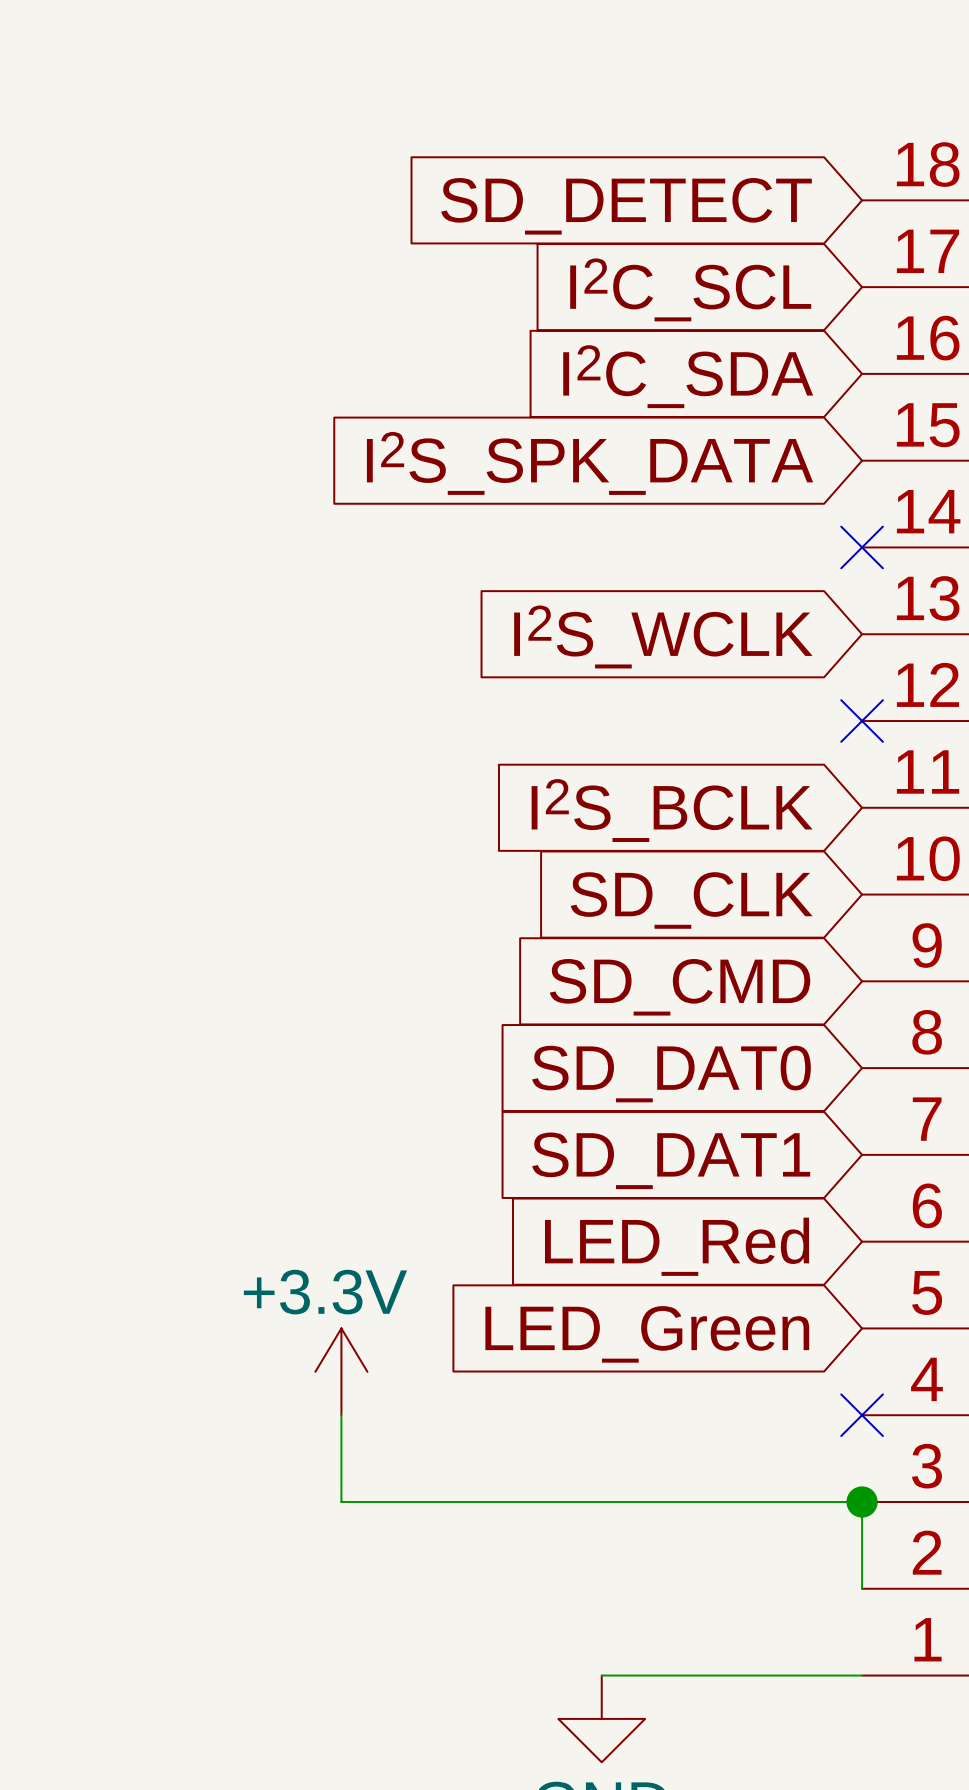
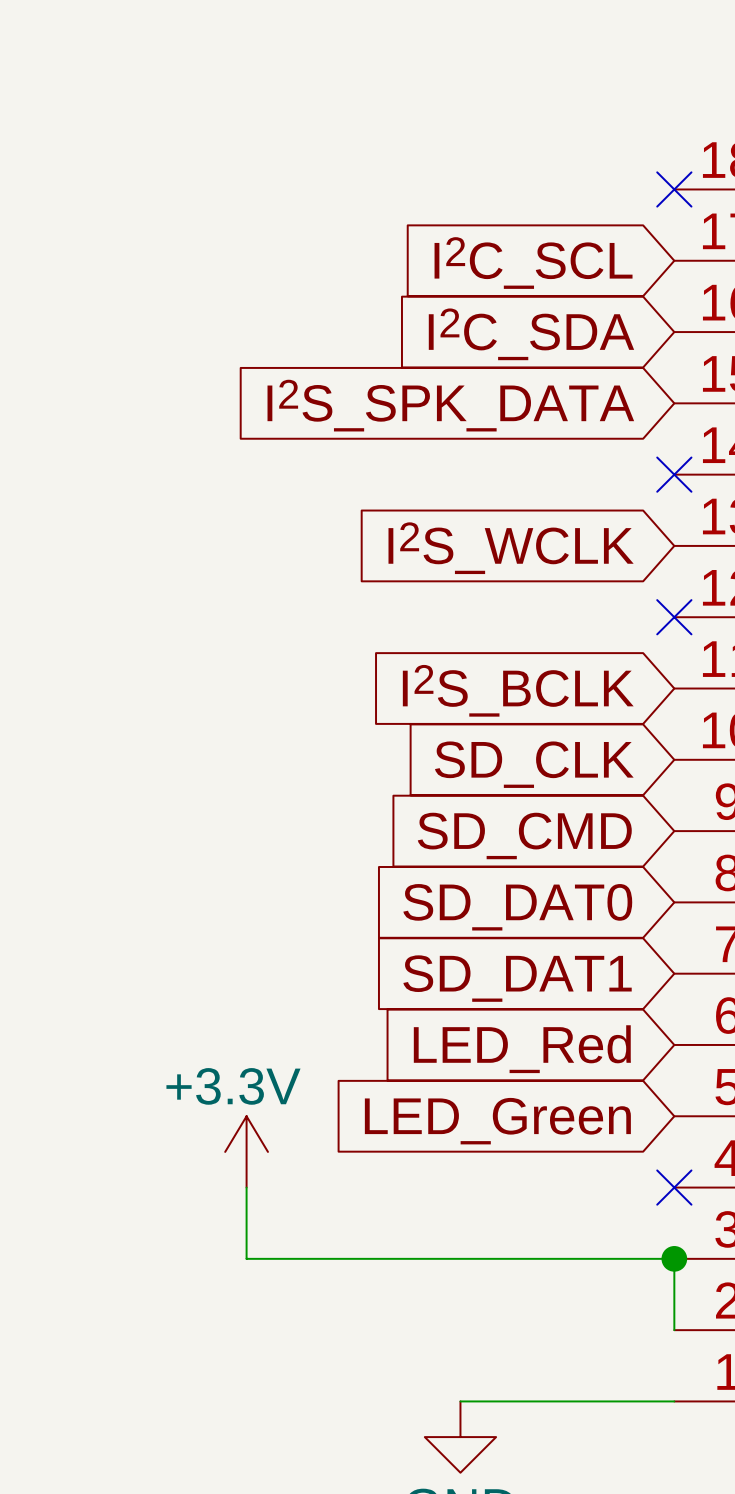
no-connect mark: none -> (674, 189)
global label: SD_DETECT (626, 206) -> none

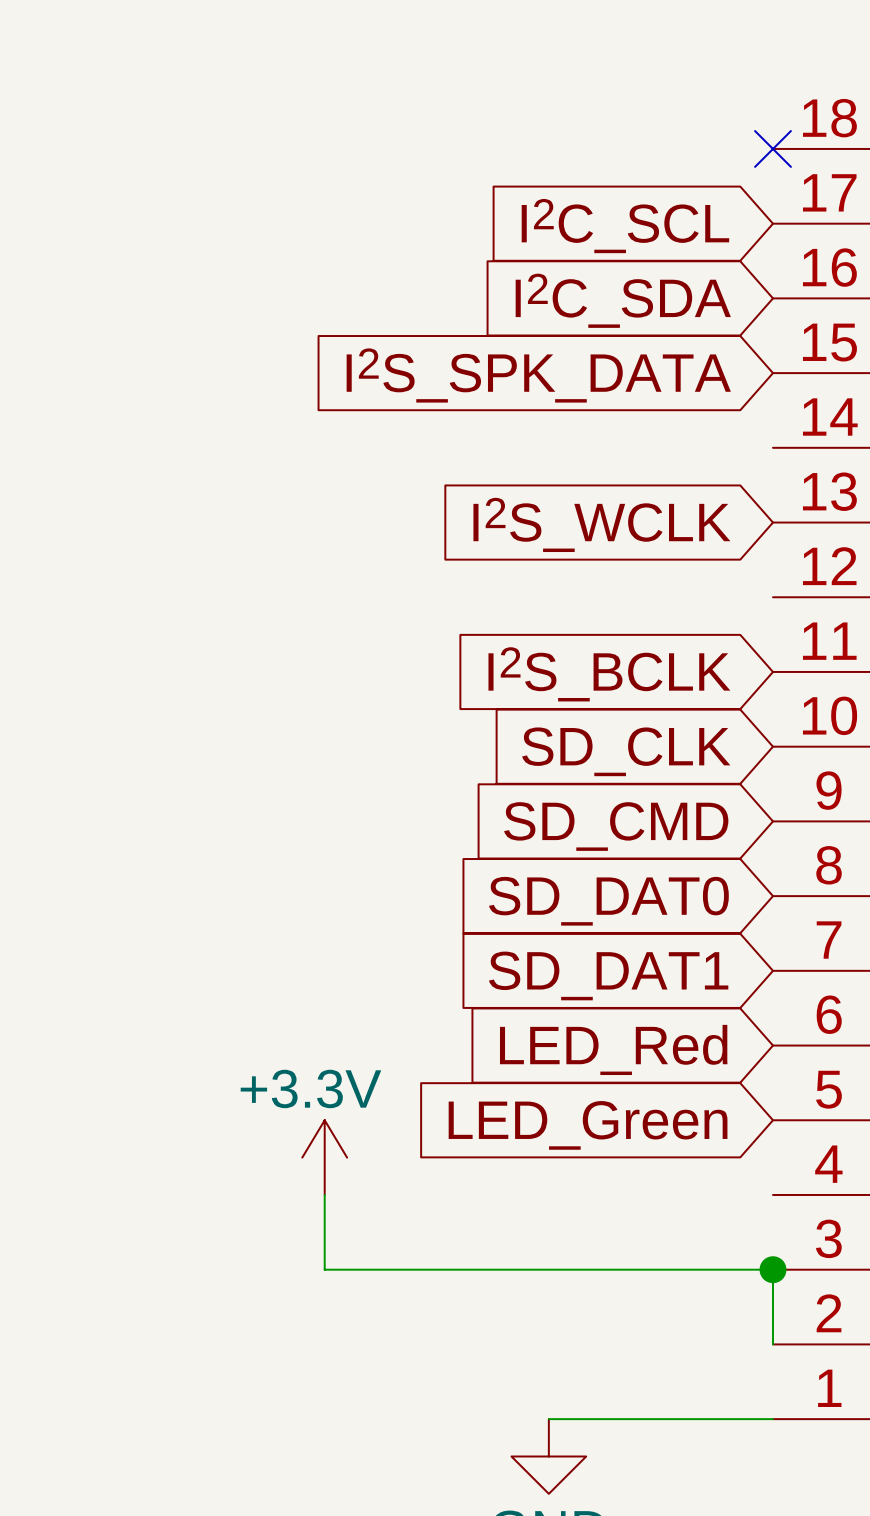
no-connect mark: (674, 474) -> none
no-connect mark: (674, 617) -> none
no-connect mark: (674, 1187) -> none

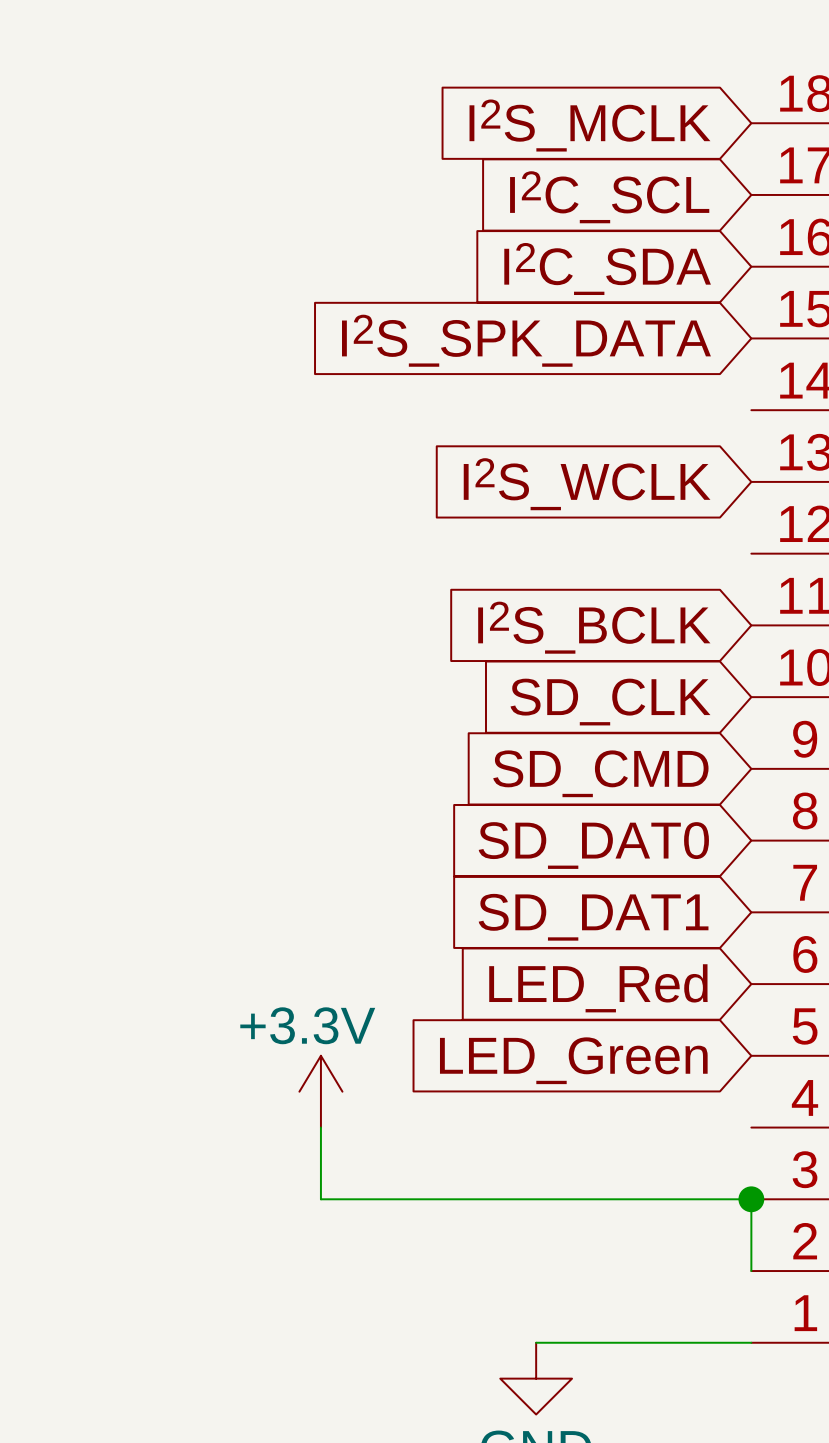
no-connect mark: (773, 148) -> none
global label: none -> I2S_MCLK (589, 125)

